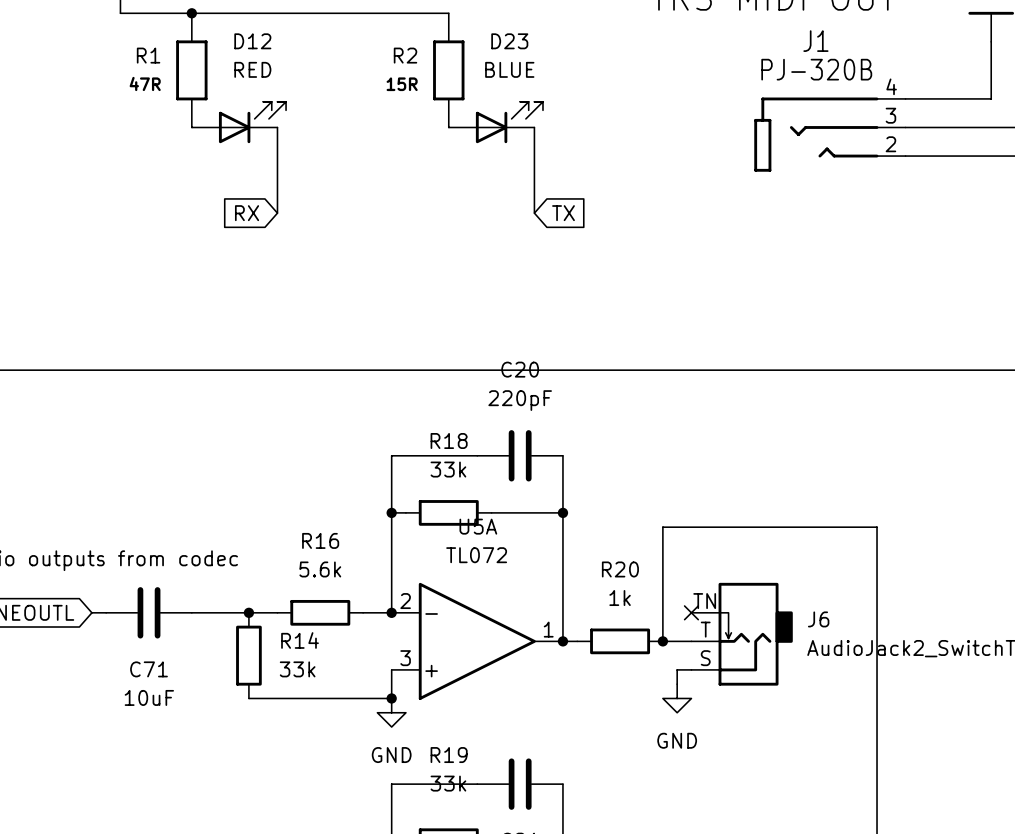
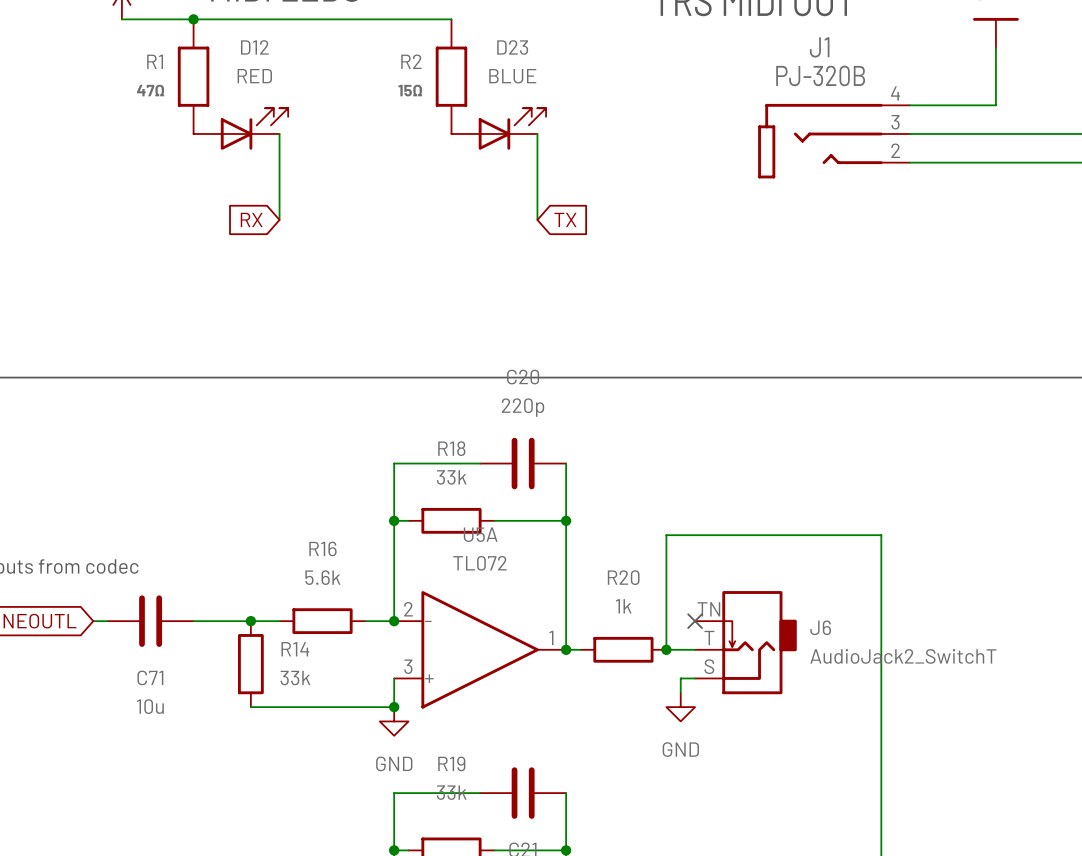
R1 value: 47R (145, 83) -> 47Ω (150, 90)
R2 value: 15R (402, 84) -> 15Ω (410, 90)
C20 value: 220pF (520, 400) -> 220p (523, 407)
C71 value: 10uF (149, 697) -> 10u (150, 706)

